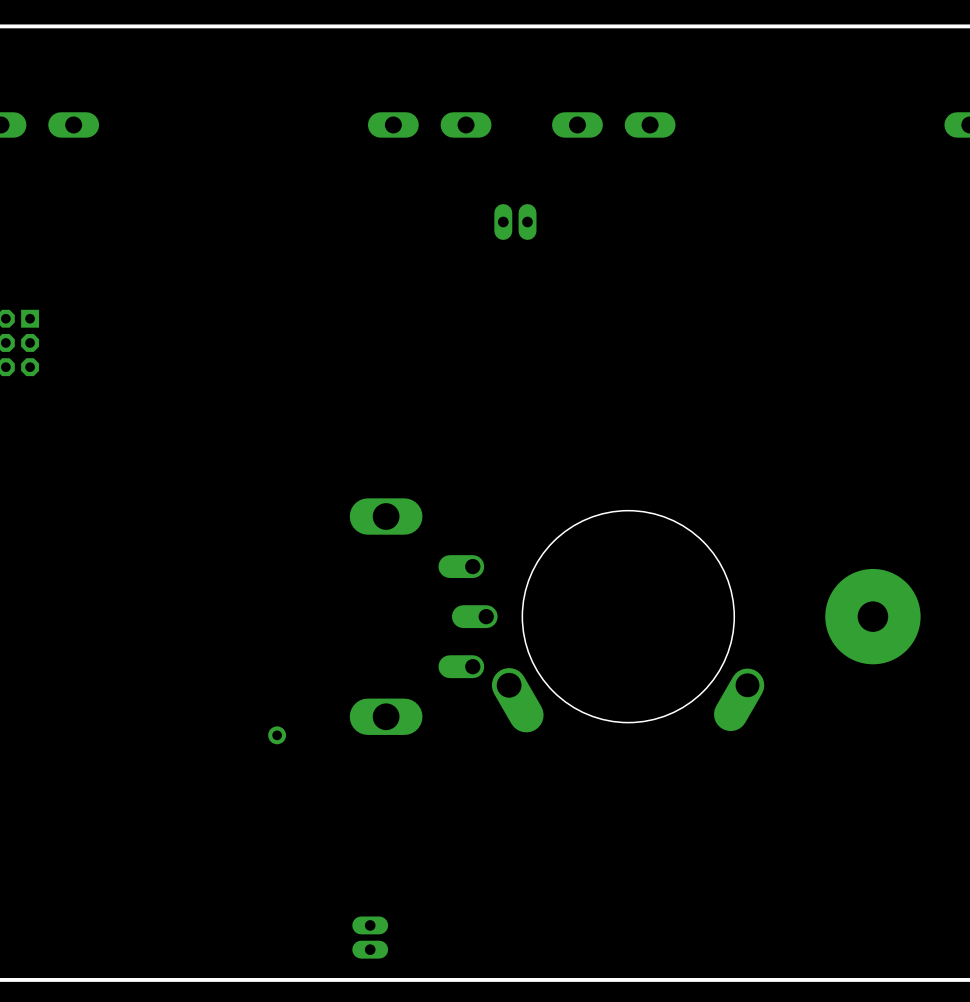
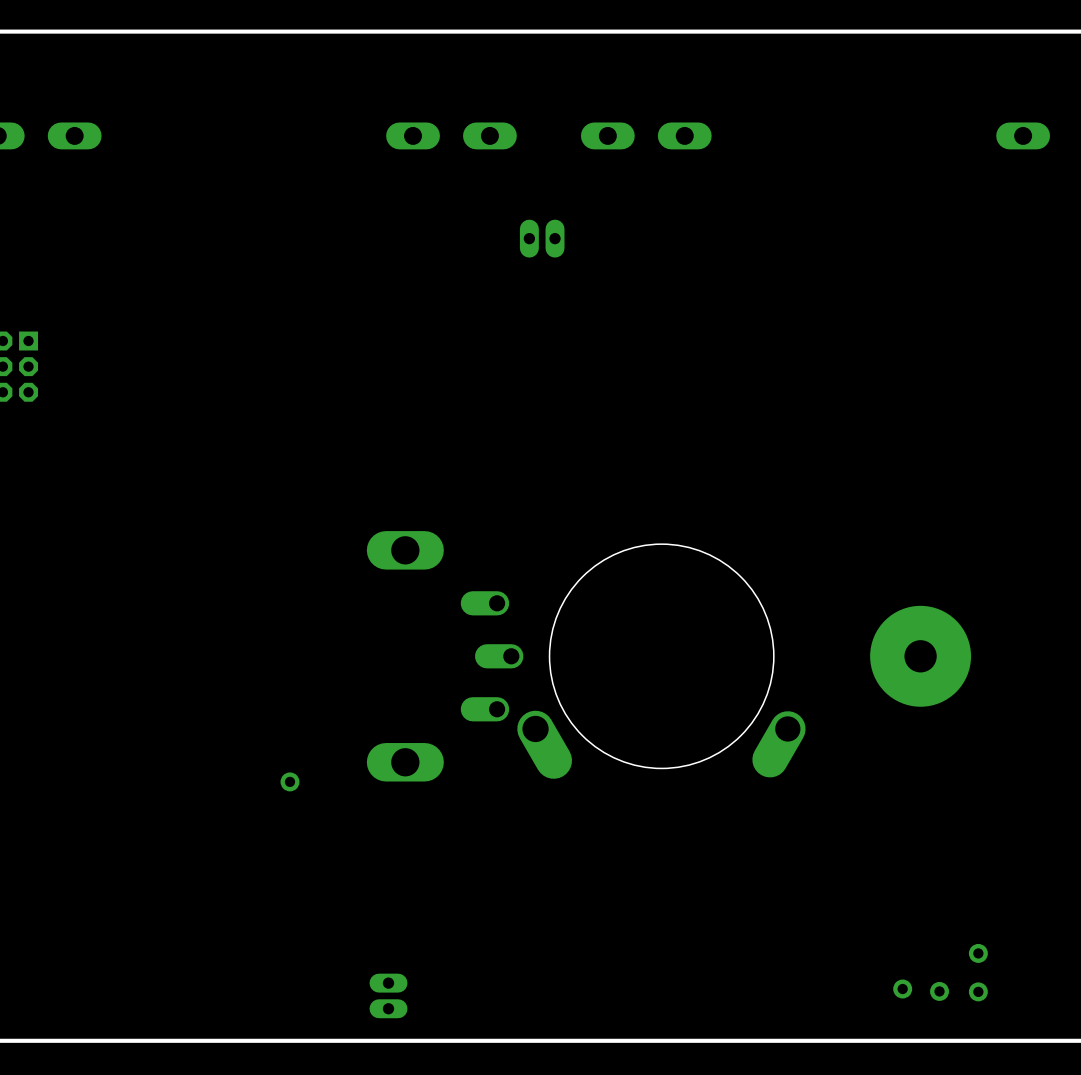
part: none -> (978, 953)
part: none -> (902, 989)
part: none -> (939, 991)
part: none -> (978, 991)

